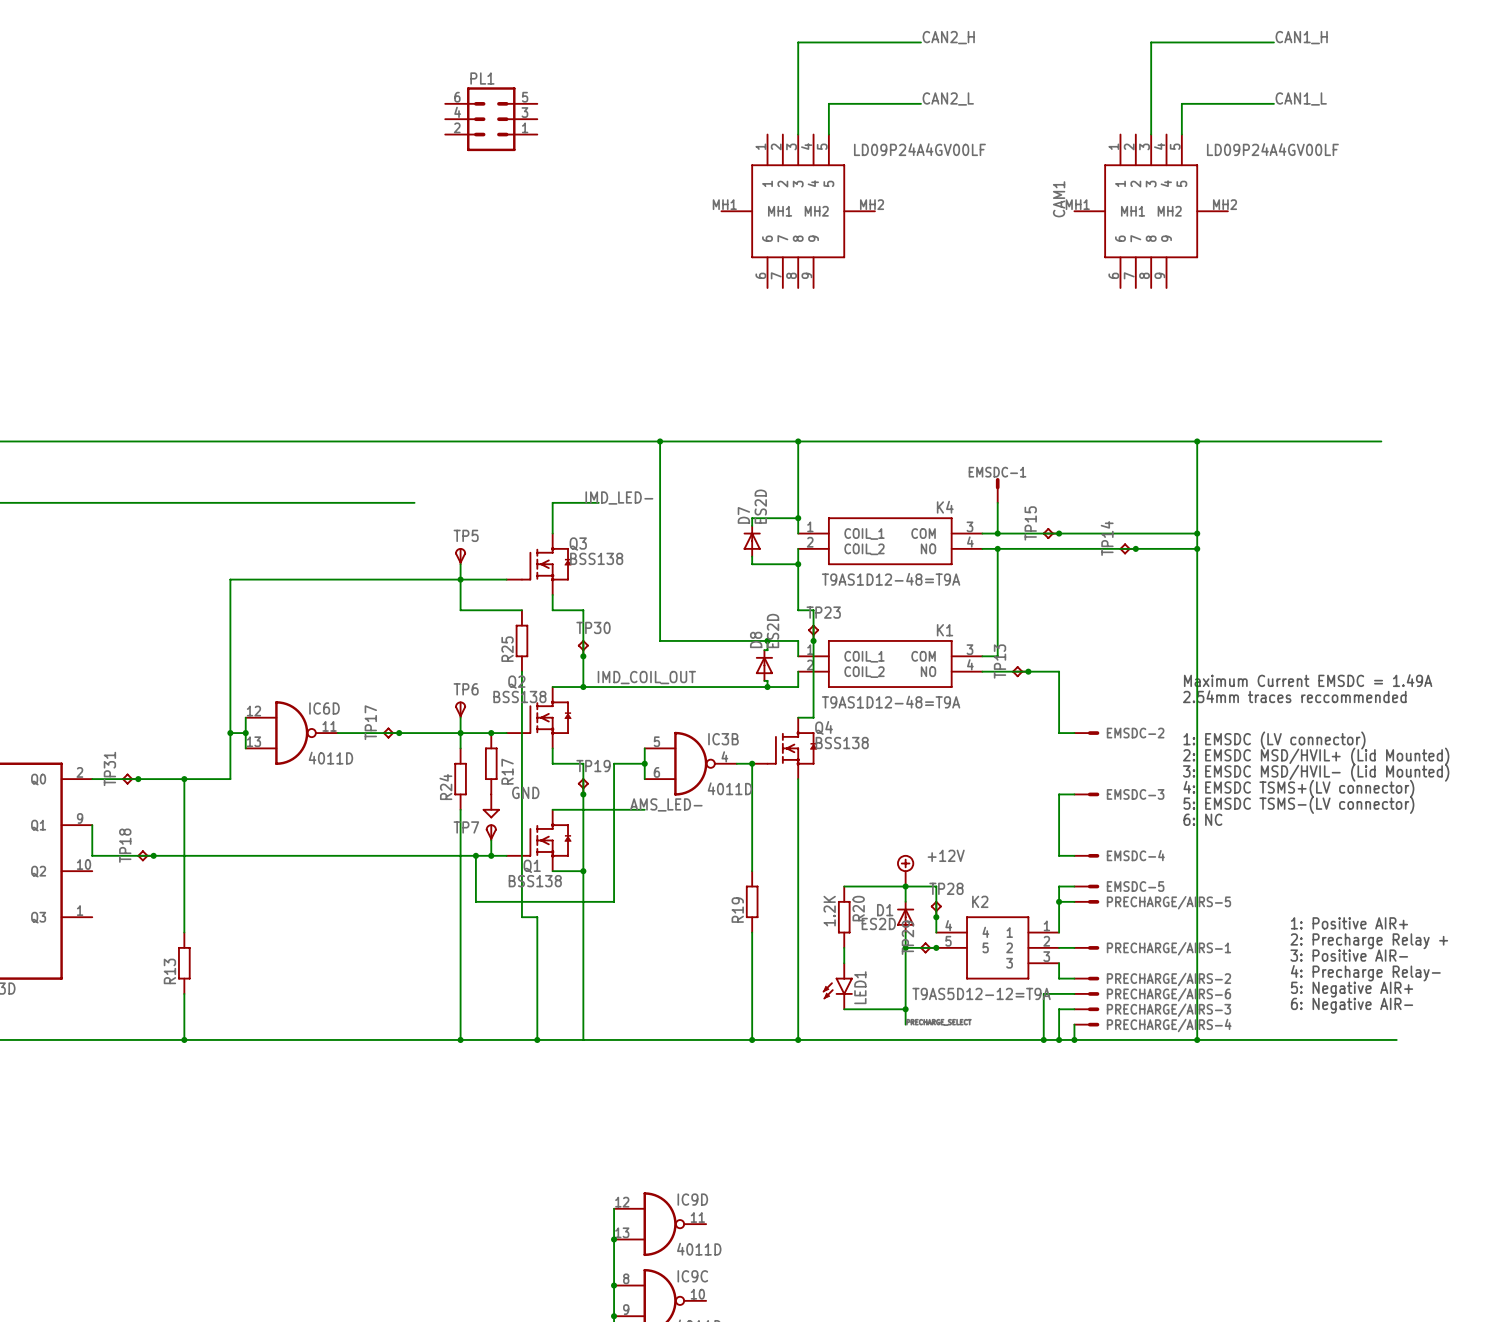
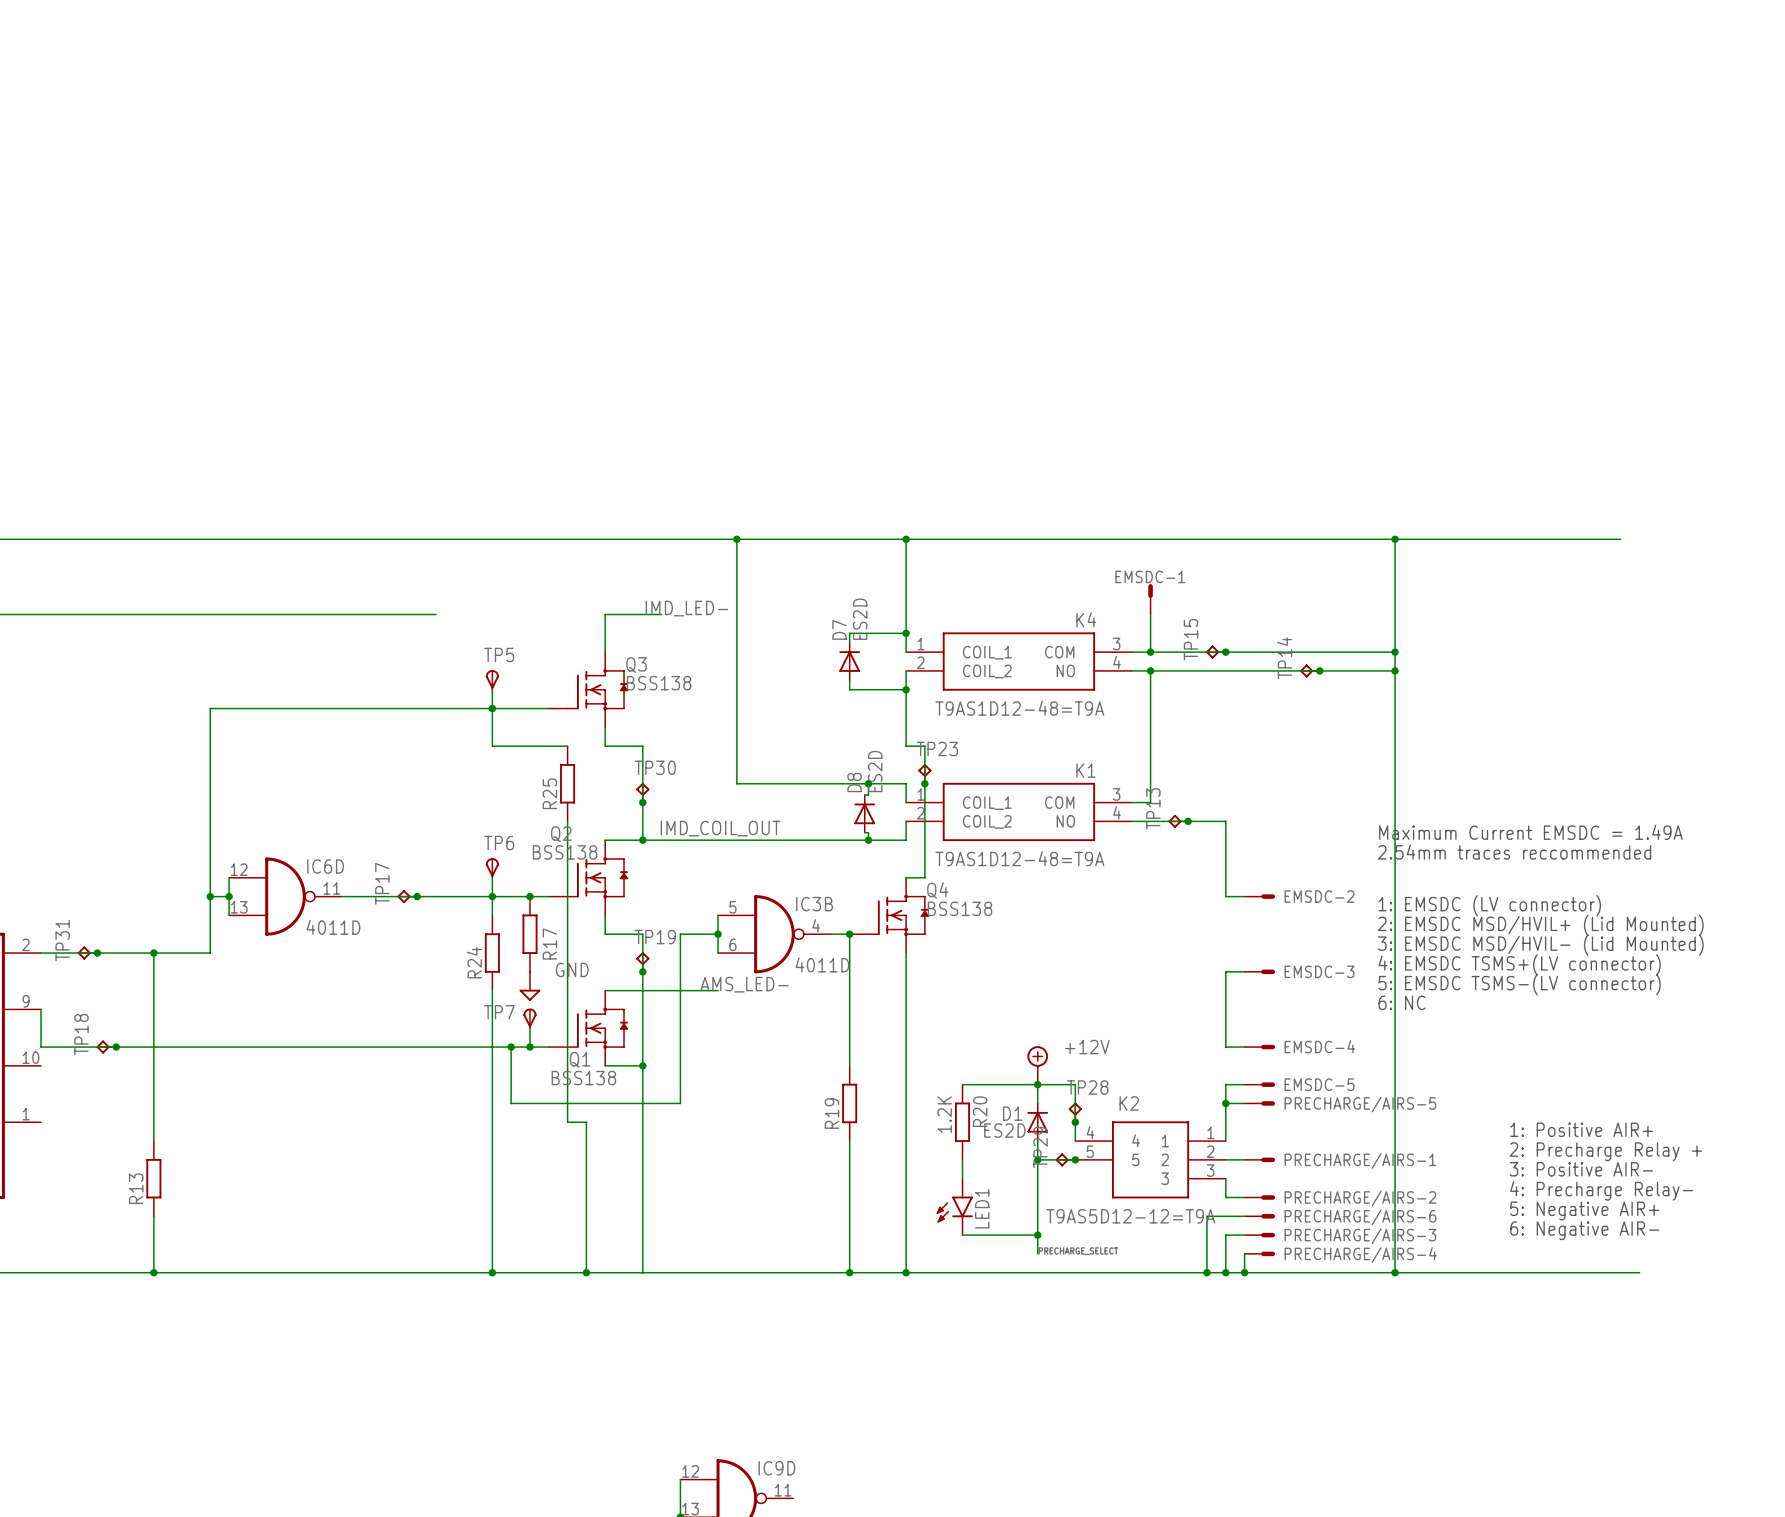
label: CAN2_H (948, 37) -> none
label: CAN1_H (1301, 37) -> none
wire: (920, 42) (798, 42) (798, 134) -> none
wire: (1273, 42) (1151, 42) (1151, 134) -> none
label: CAN2_L (948, 98) -> none
label: CAN1_L (1301, 98) -> none
wire: (920, 103) (828, 103) (828, 134) -> none
wire: (1273, 103) (1181, 103) (1181, 134) -> none
PL1: (491, 119) -> none
part: LD09P24A4GV00LF (798, 211) -> none
CAM1: LD09P24A4GV00LF (1151, 211) -> none

